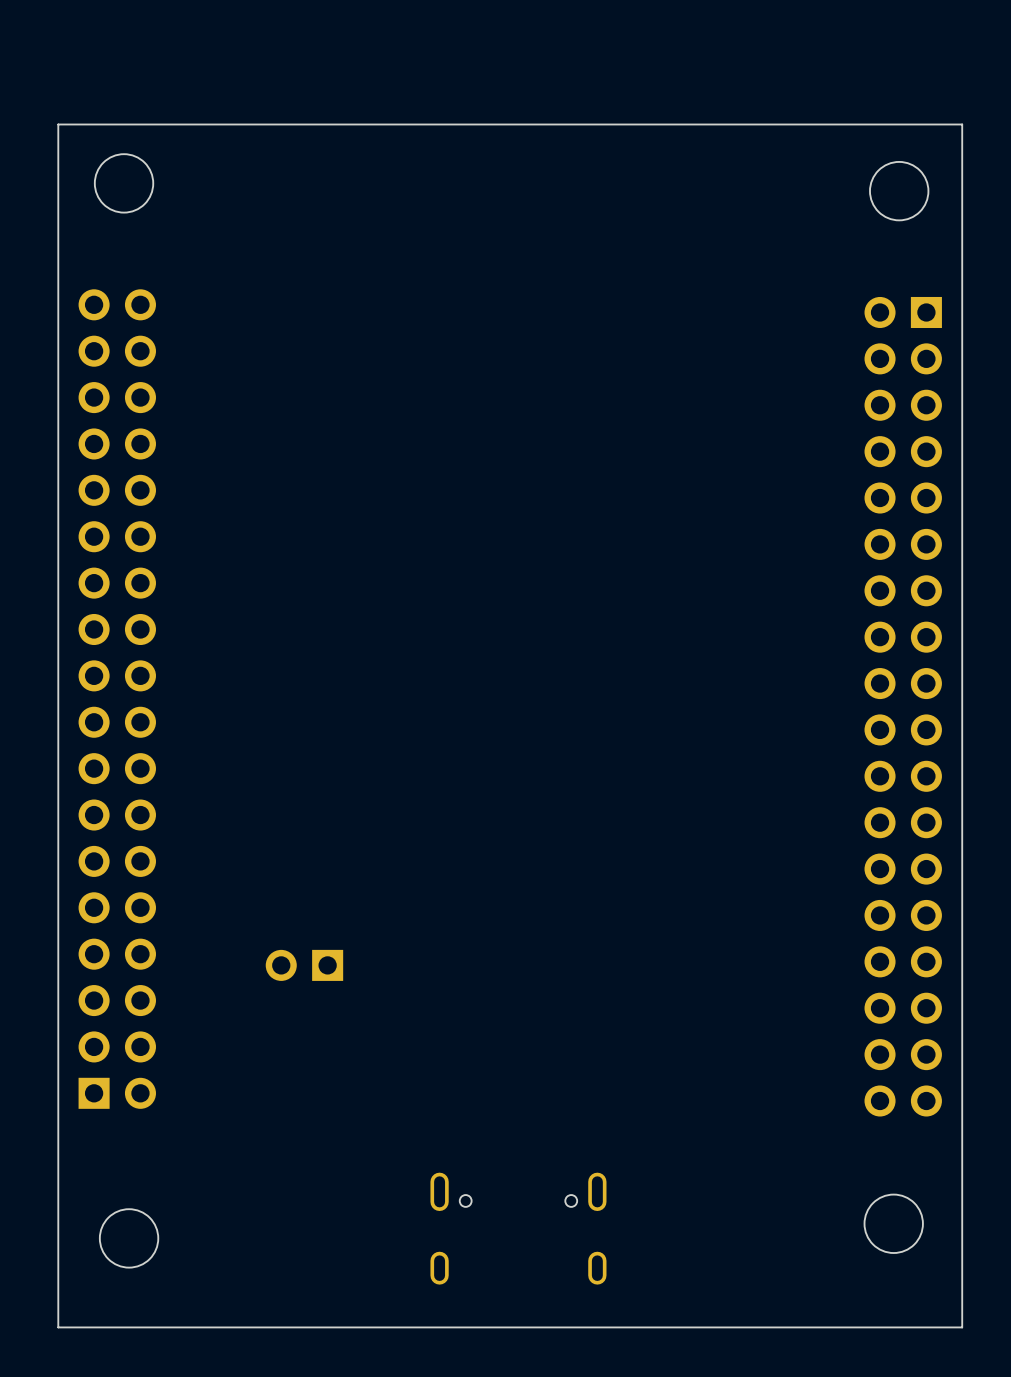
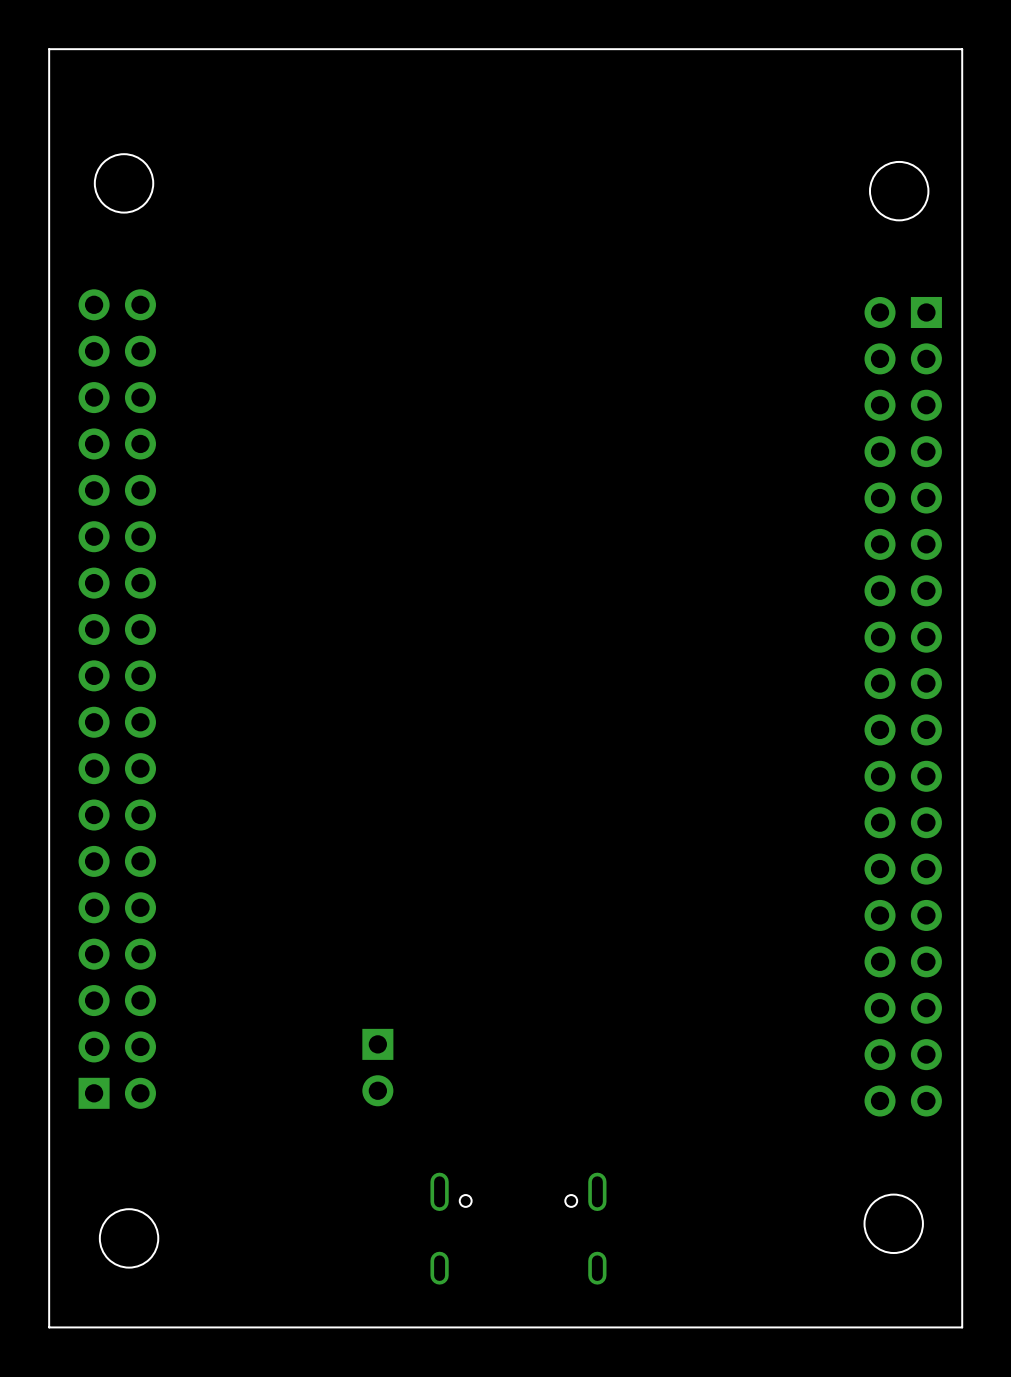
board edge: (962, 124) (58, 124) (58, 1327) -> (962, 124) (962, 49) (49, 49) (49, 1327) (58, 1327)
part rotation: 0° (304, 965) -> 90° counterclockwise (377, 1067)
part position: (304, 965) -> (377, 1067)

